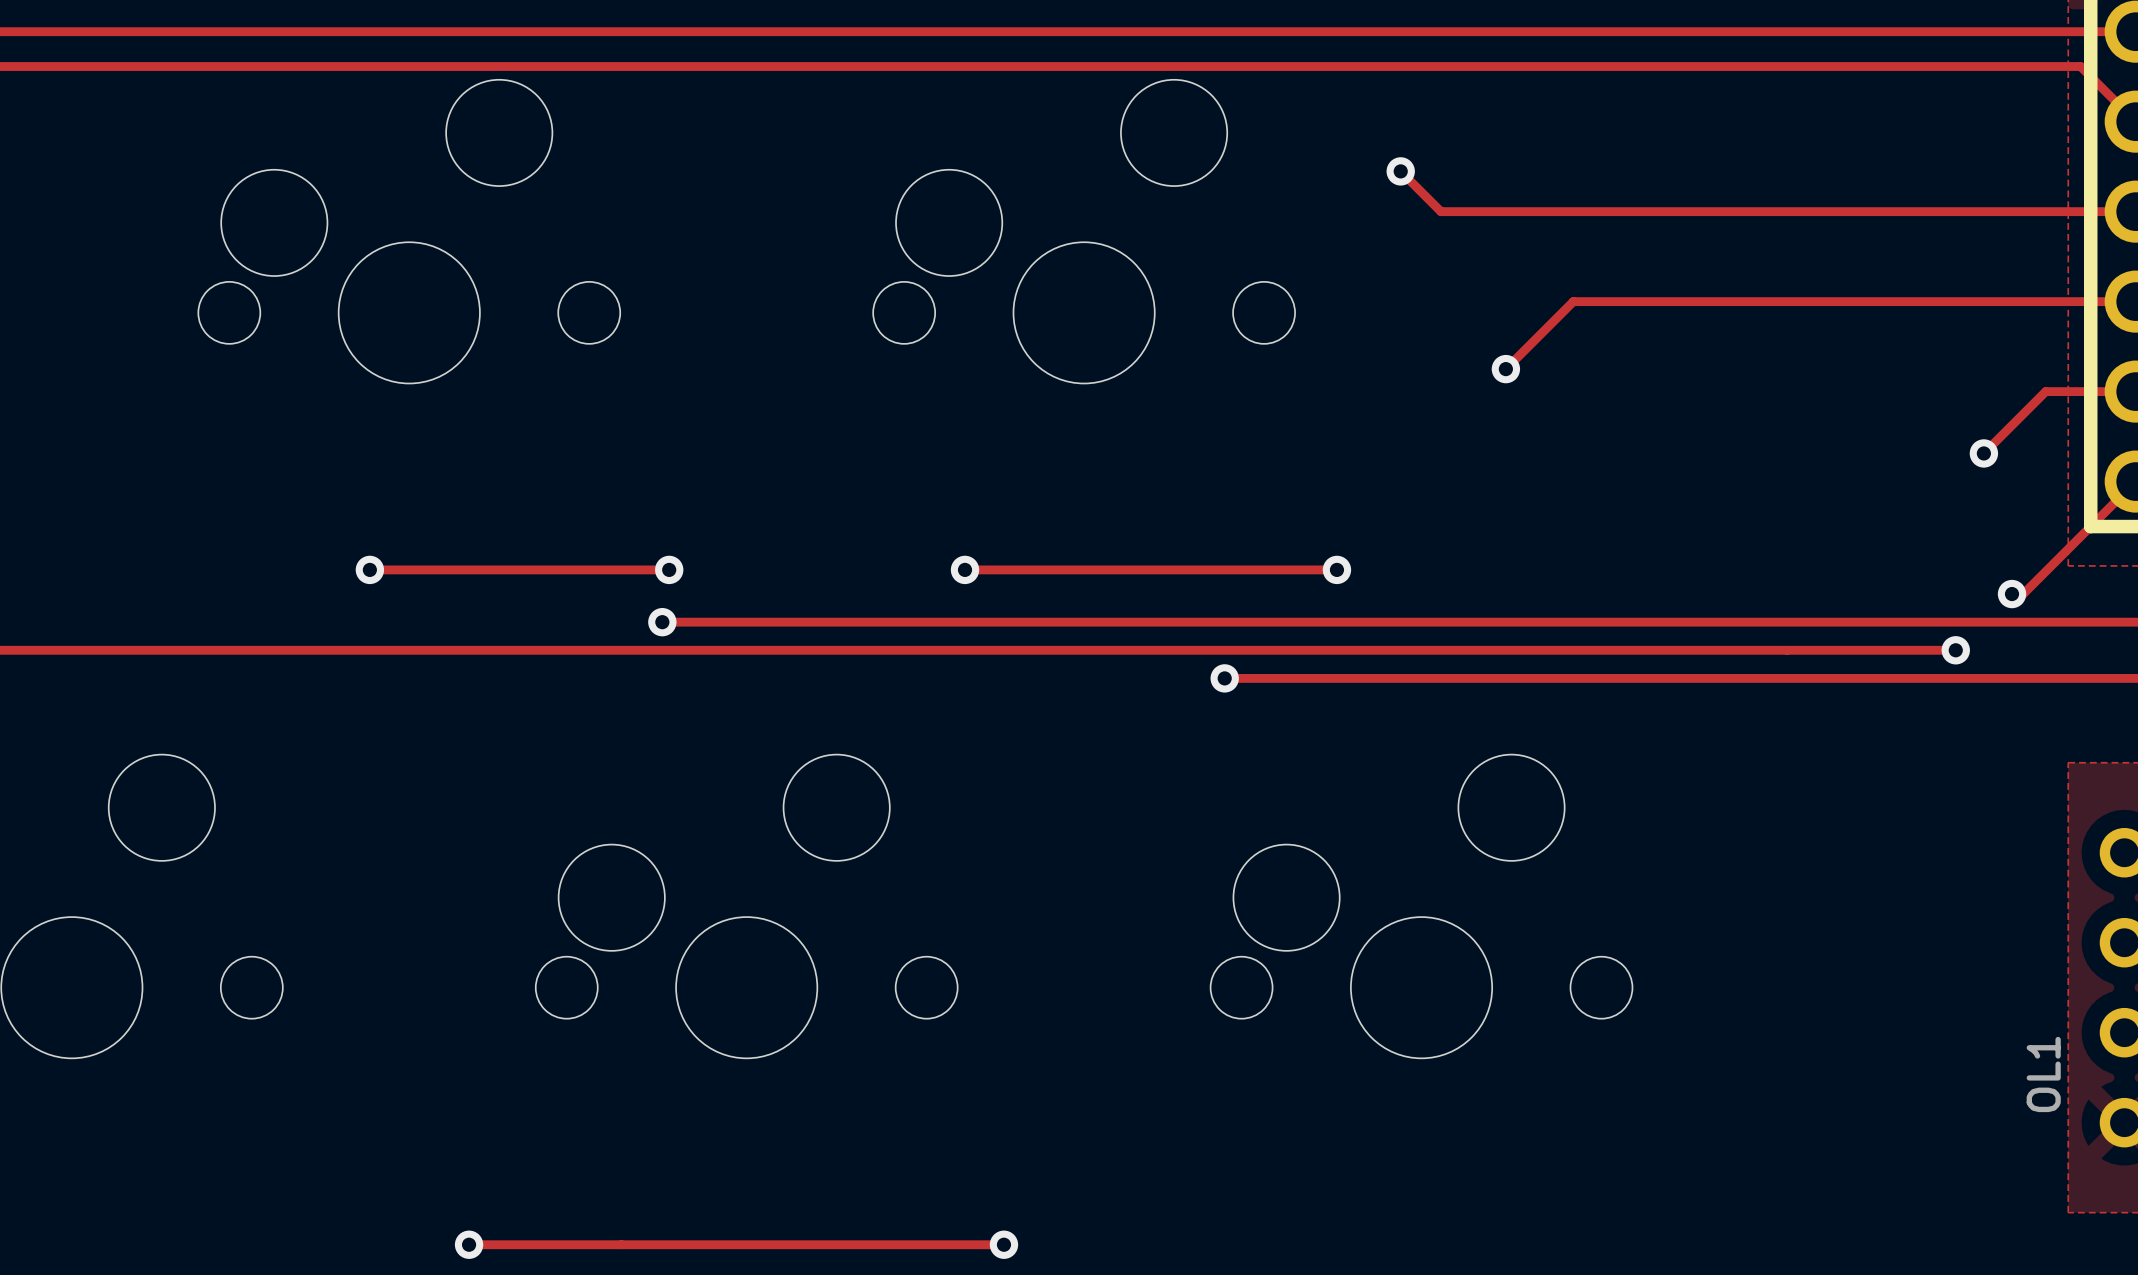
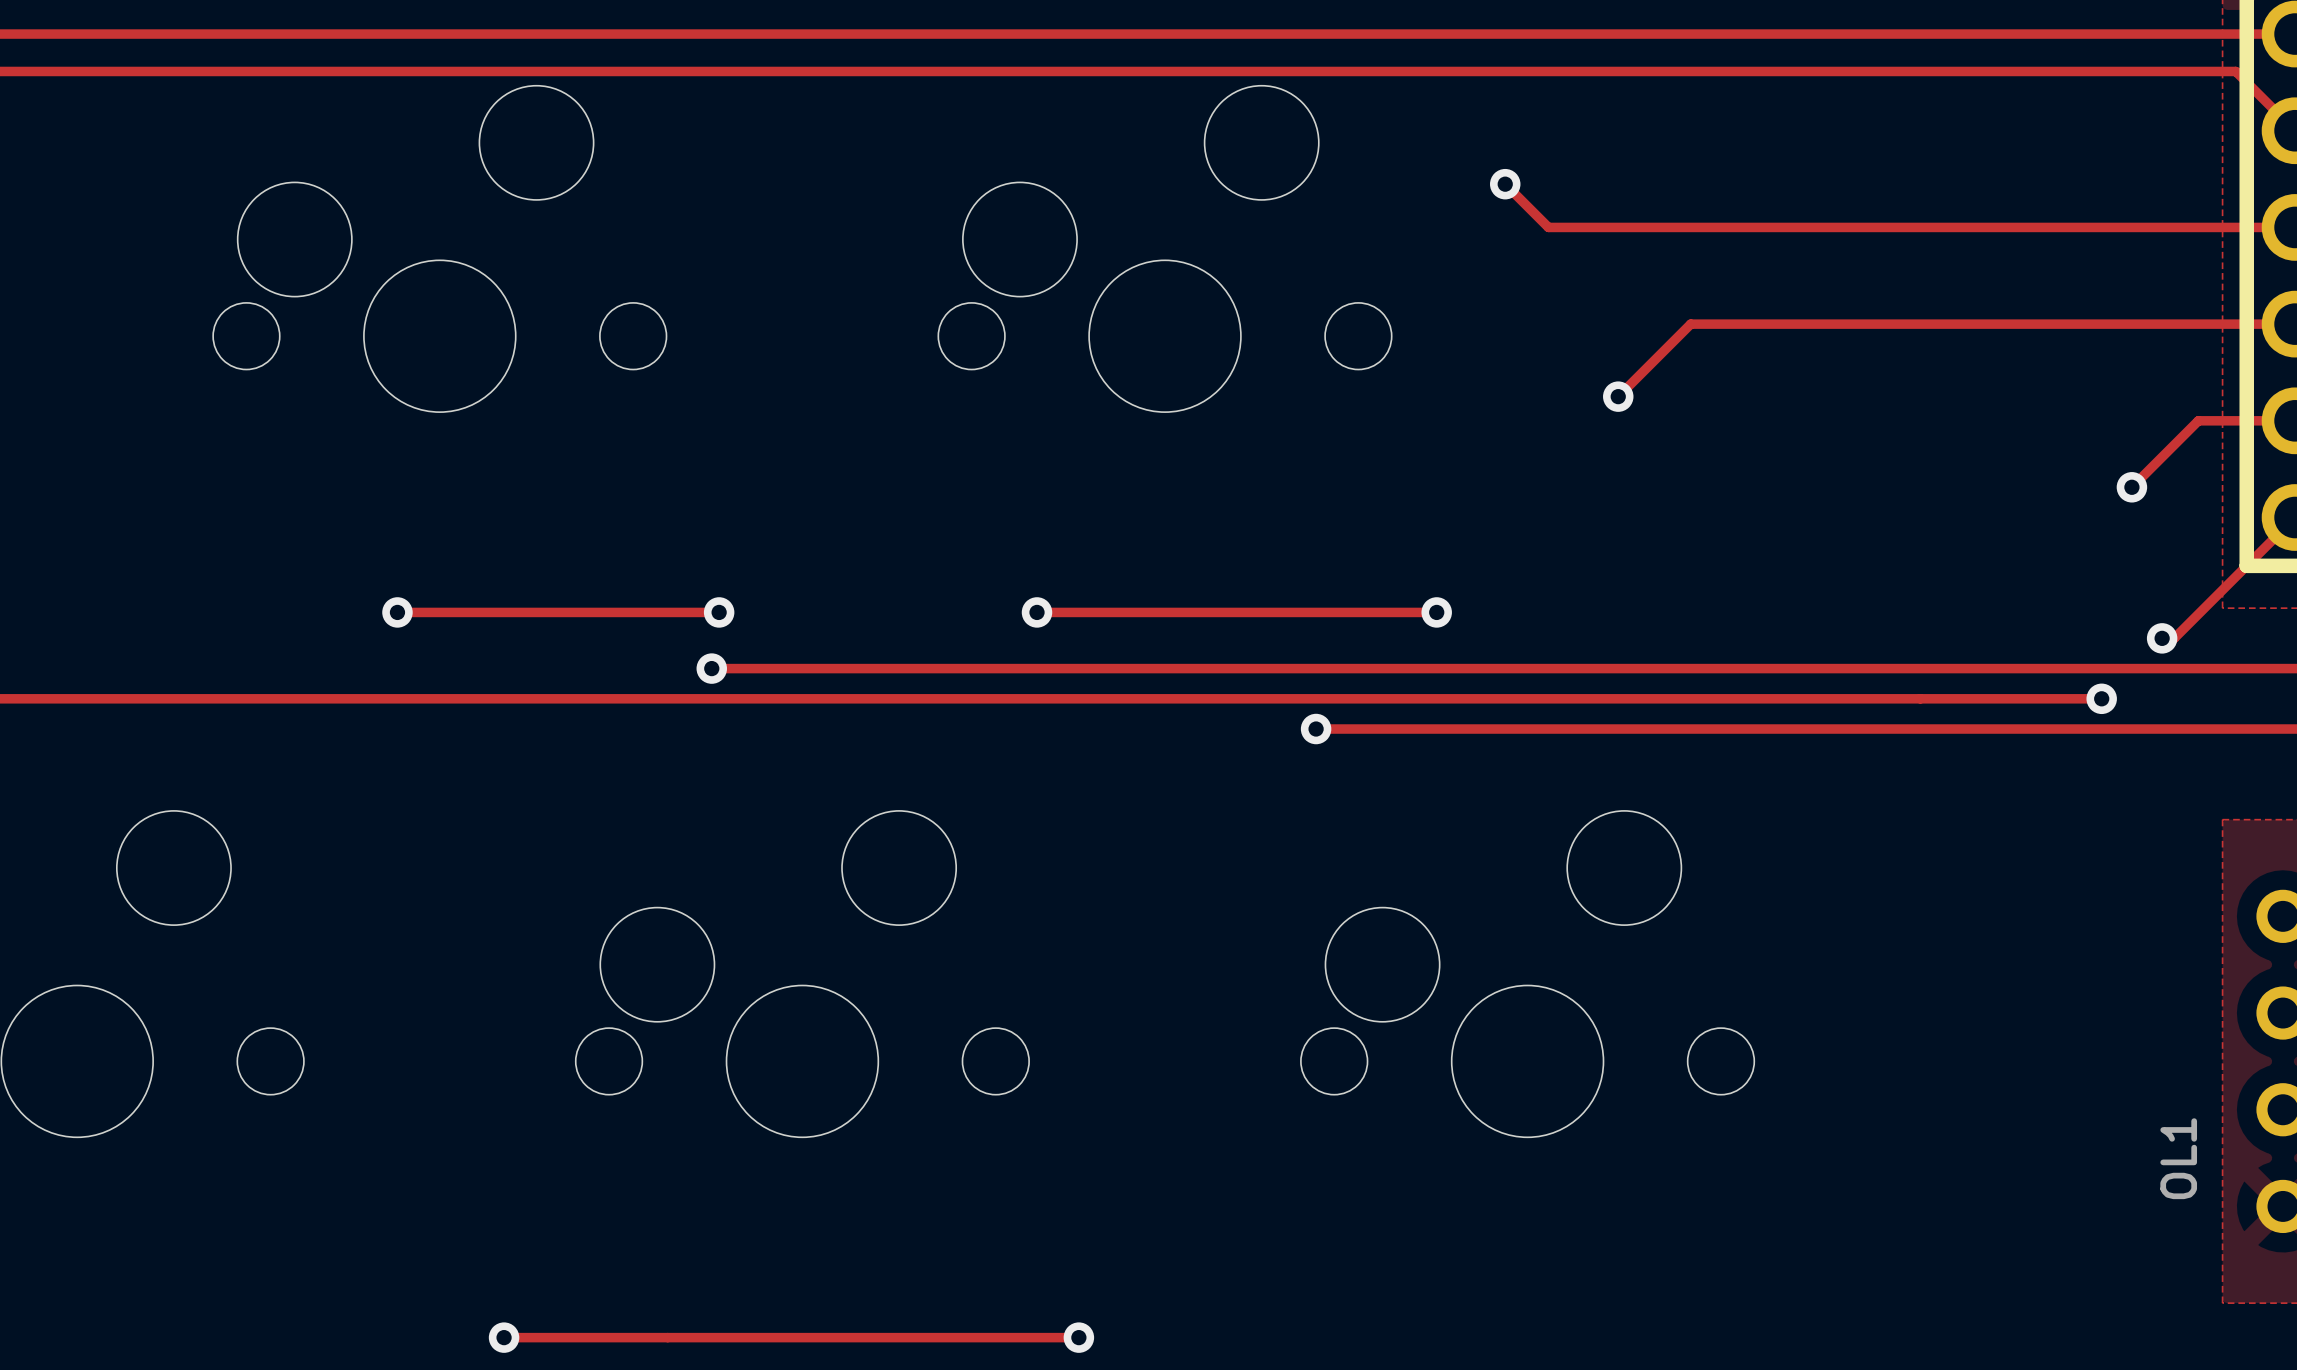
OL1 name position: OL1 (2043, 1074) -> OL1 (2178, 1158)

